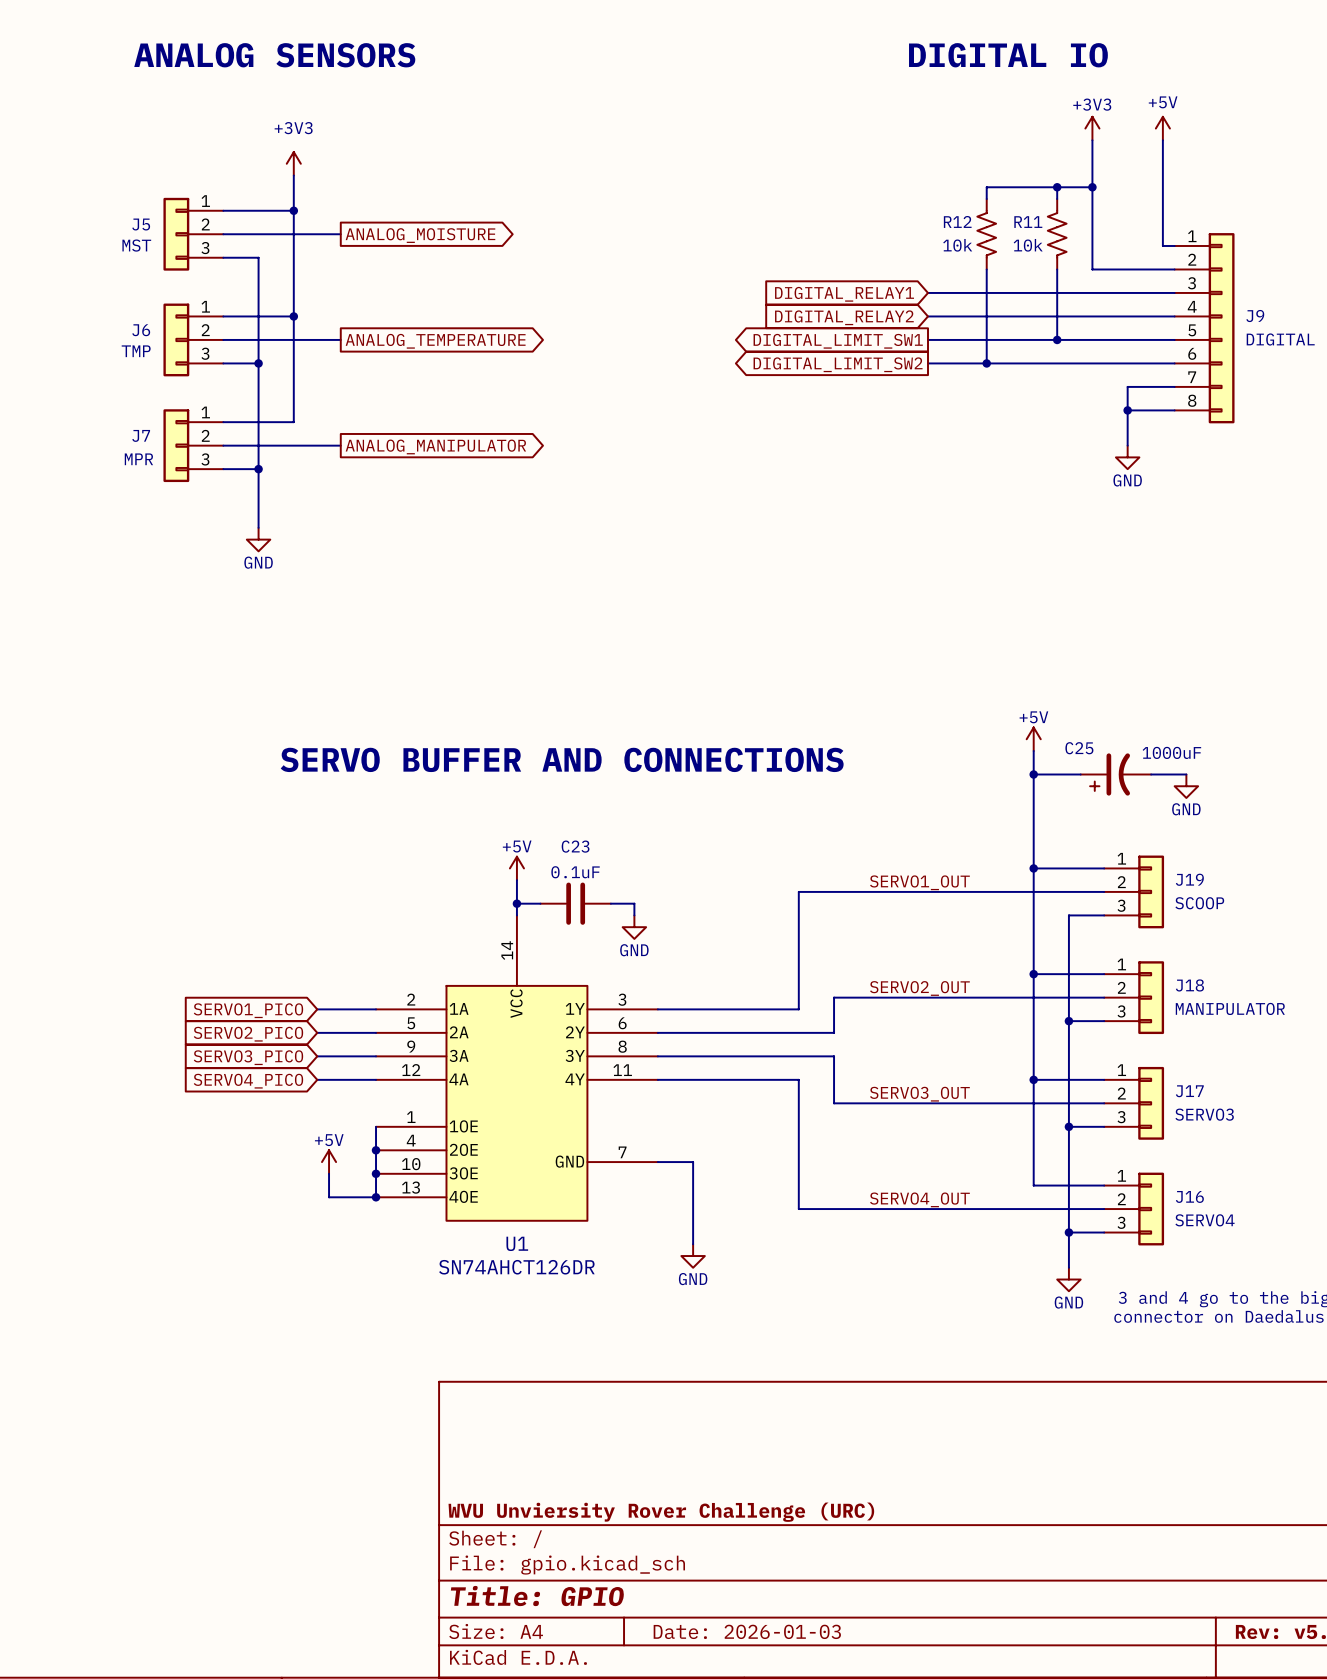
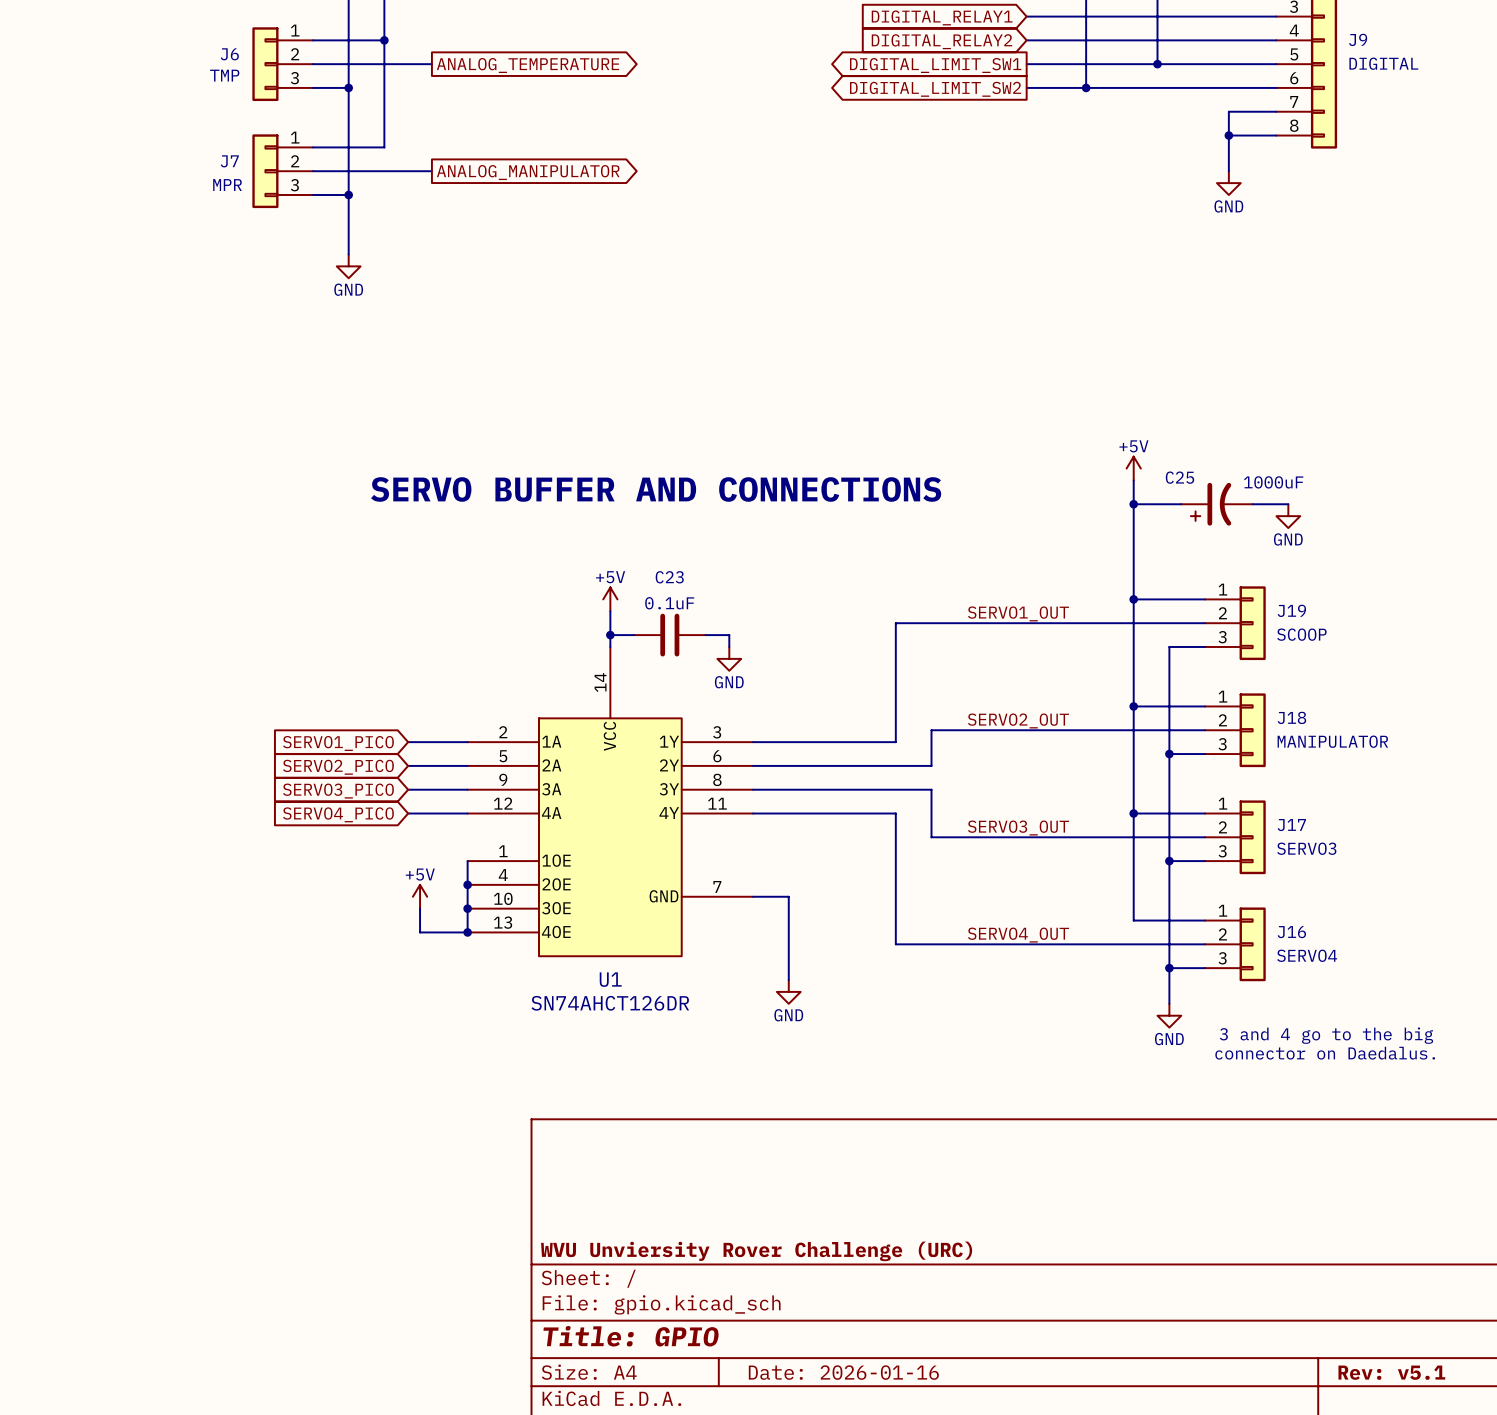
title block: Date: 2026-01-03 (747, 1631) -> Date: 2026-01-16 (843, 1372)

